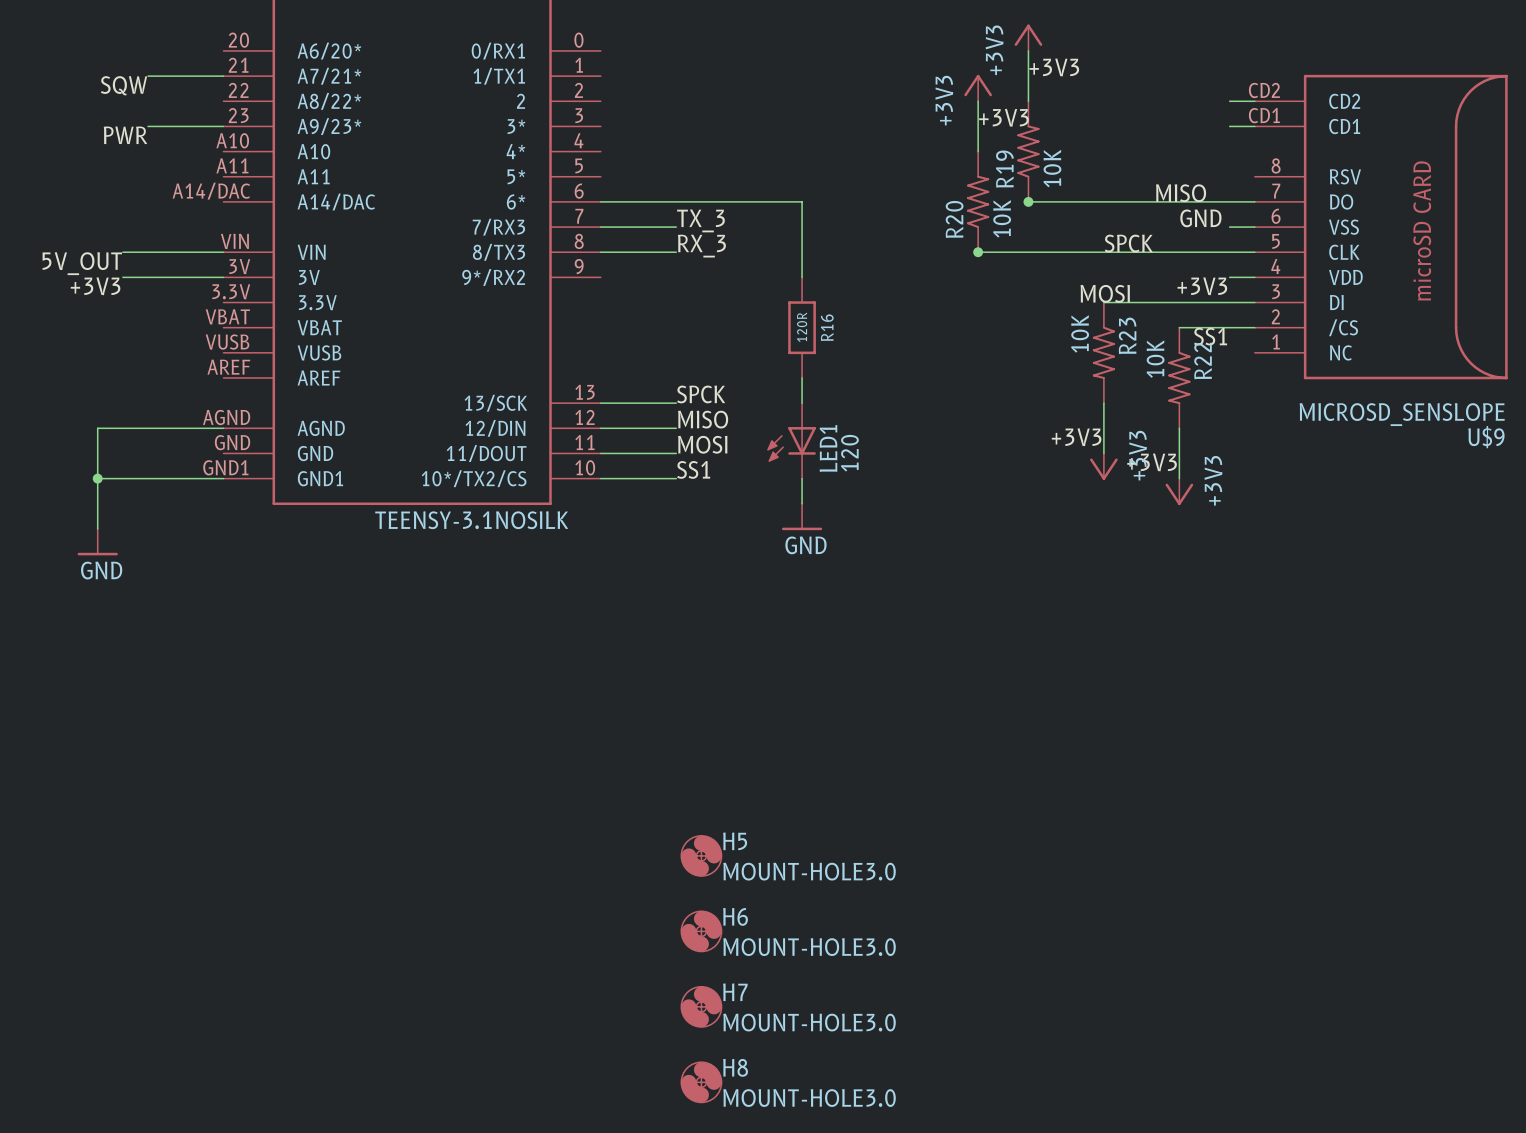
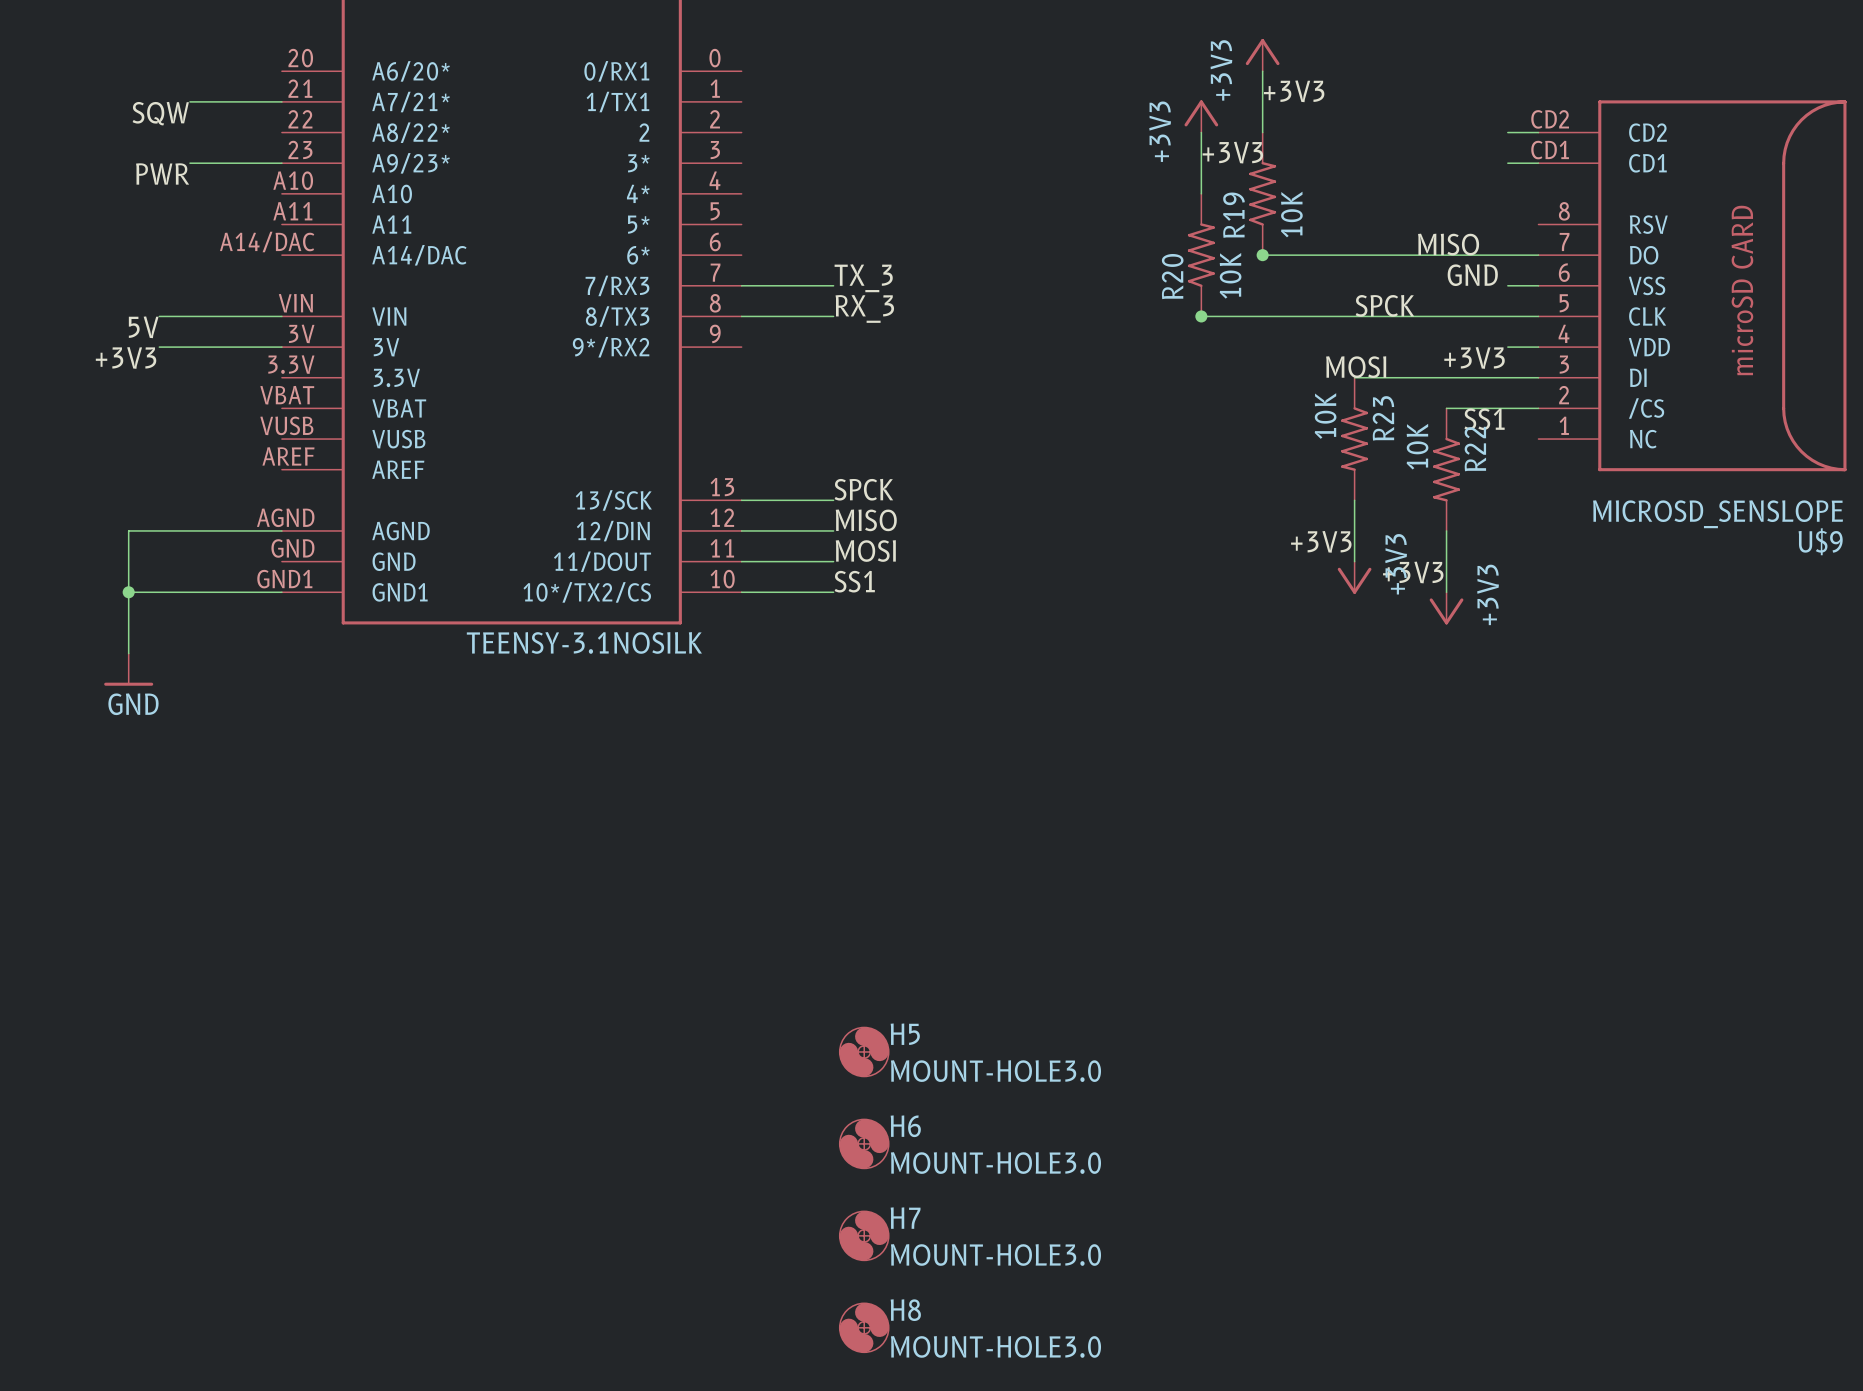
wire: (600, 201) (802, 201) (802, 277) -> none
label: 5V_OUT (82, 263) -> 5V (143, 327)
R16: 120R (802, 327) -> none
wire: (802, 377) (802, 403) -> none
LED1: 120 (791, 440) -> none
wire: (802, 478) (802, 503) -> none
power symbol: GND (802, 516) -> none

